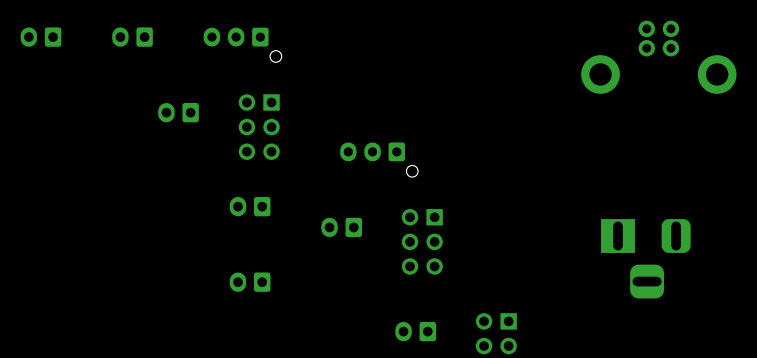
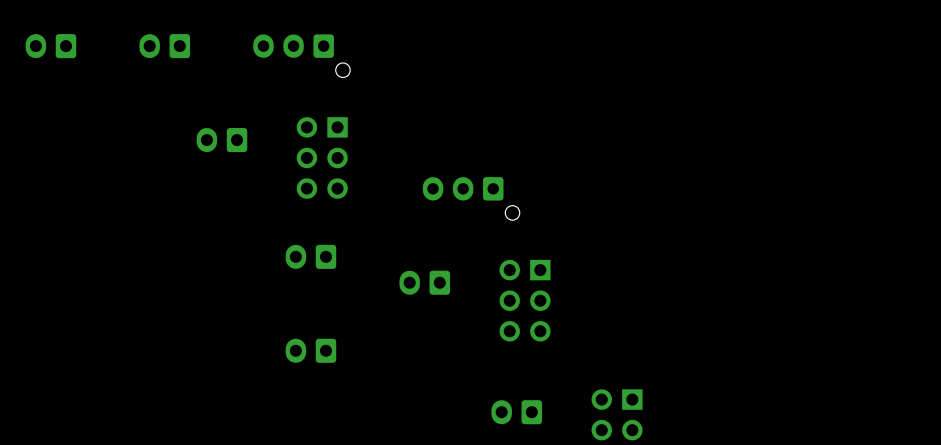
part: (658, 57) -> none
part: (645, 258) -> none

